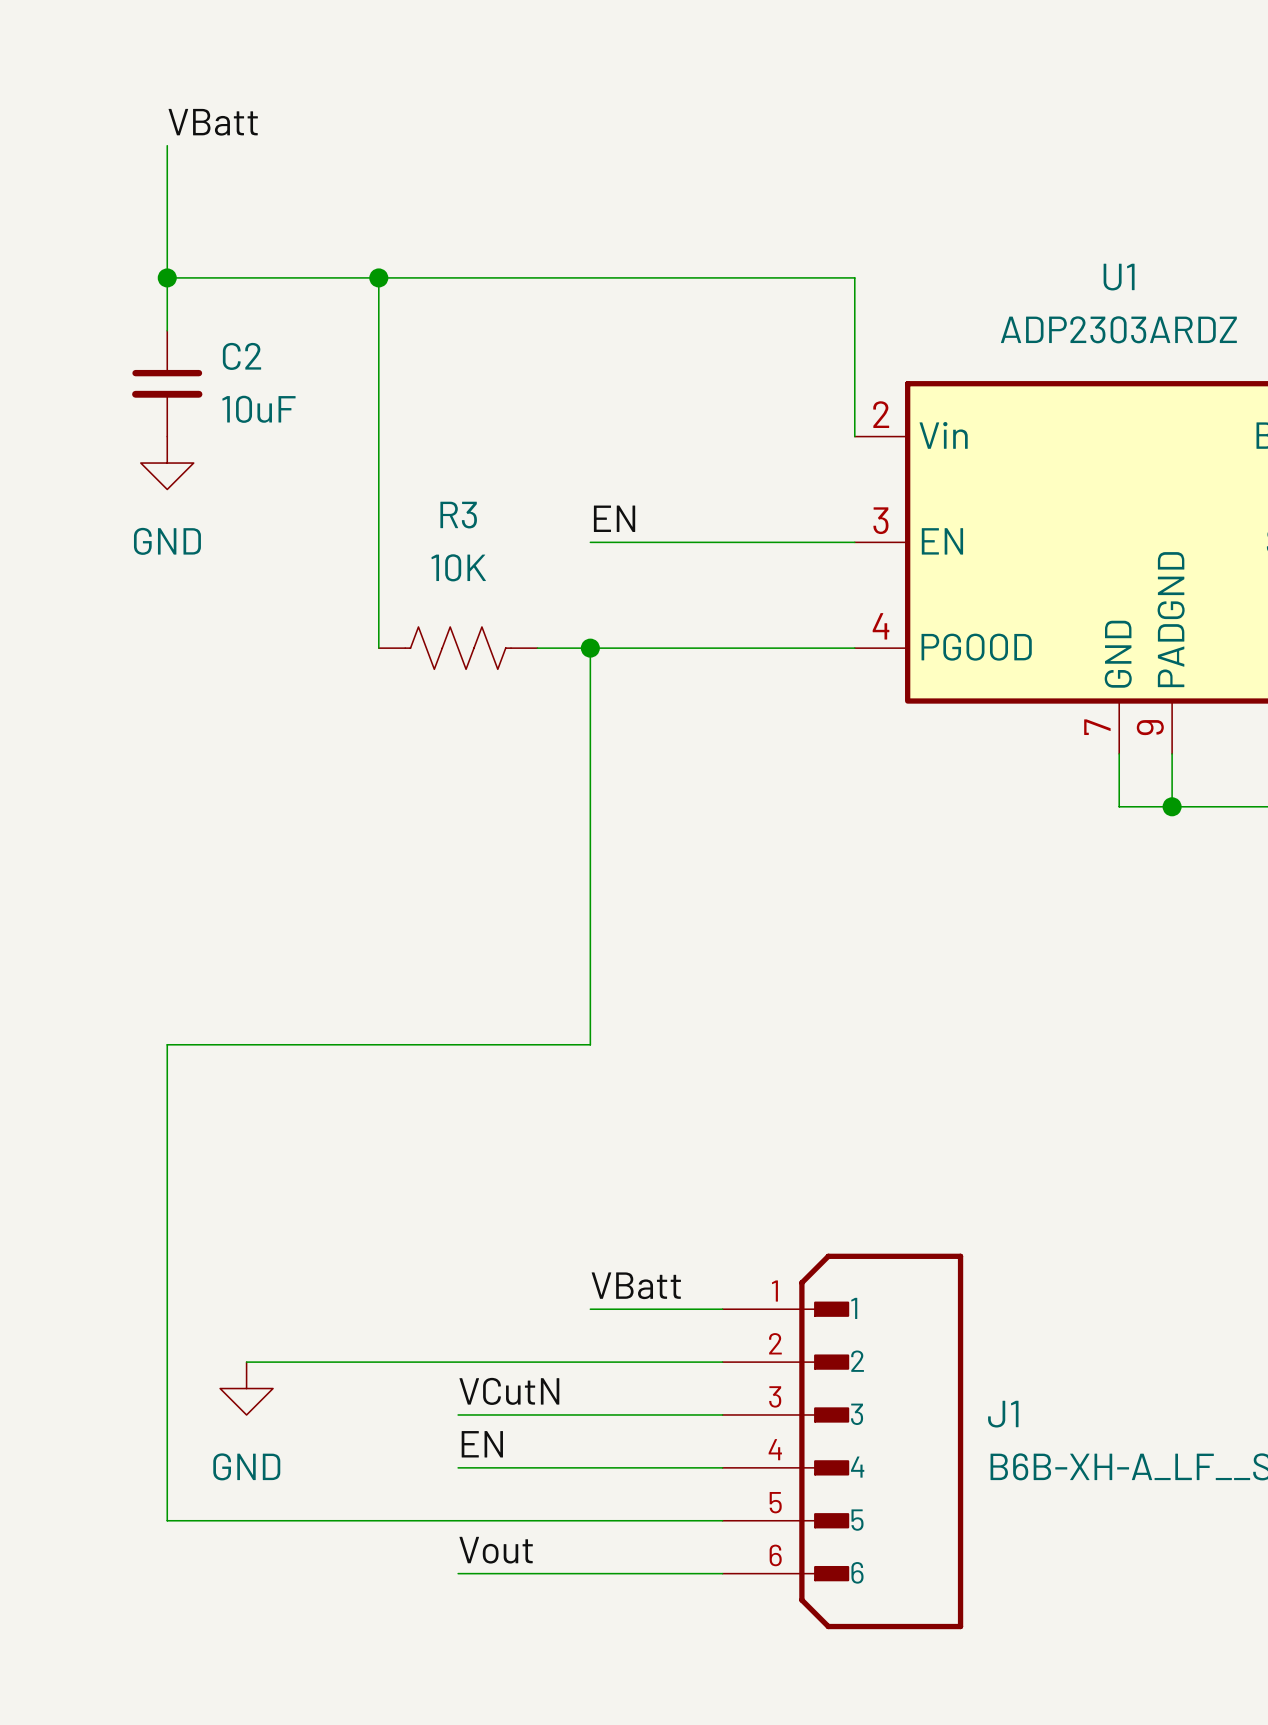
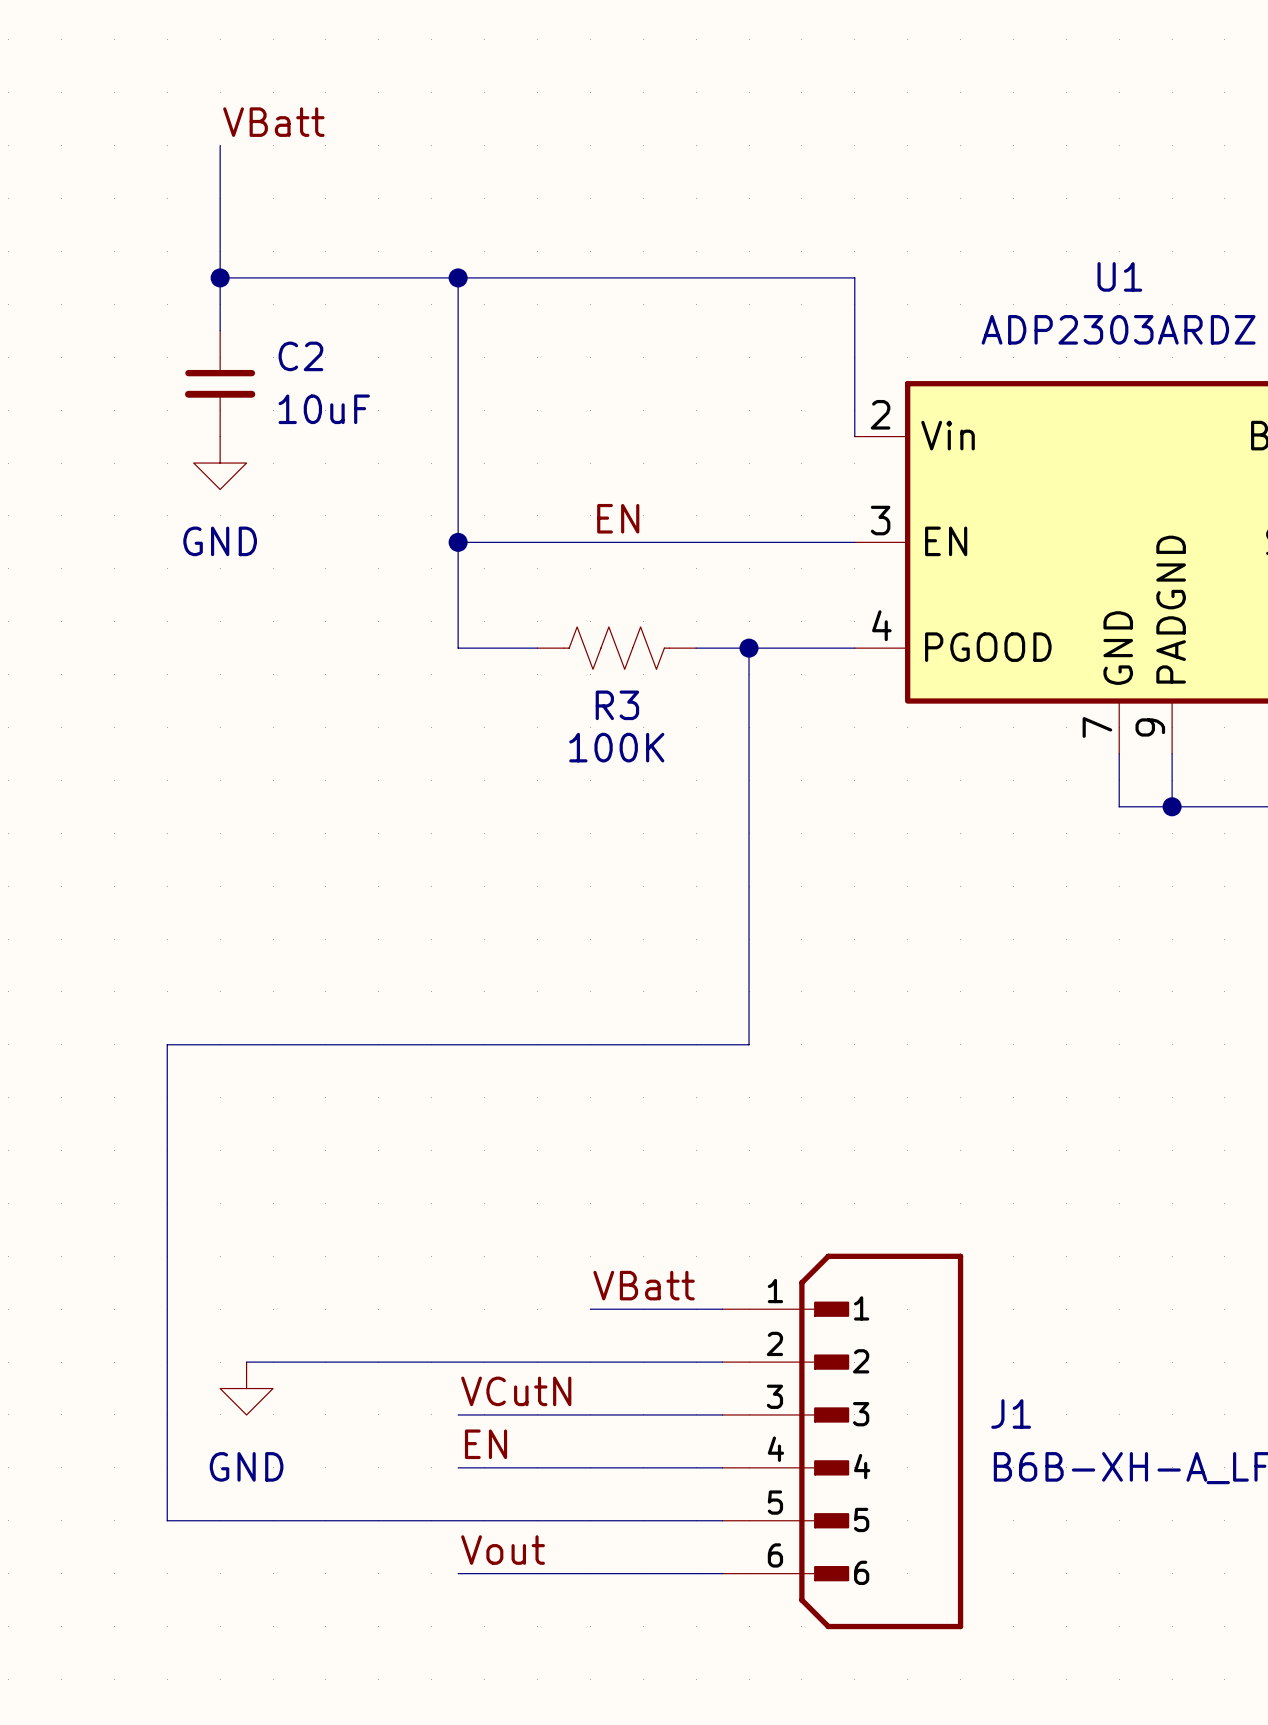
label position: VBatt (213, 122) -> VBatt (273, 122)
wire: (167, 145) (167, 330) -> (220, 145) (220, 330)
wire: (167, 277) (220, 277) -> none
junction position: (167, 277) -> (220, 277)
wire: (378, 277) (378, 648) -> none
junction: (378, 277) -> none
junction: none -> (458, 277)
C2 position: (167, 383) -> (220, 383)
power symbol position: GND (167, 463) -> GND (220, 463)
R3 name position: R3 (458, 515) -> R3 (617, 705)
wire: none -> (458, 542) (590, 542)
junction: none -> (458, 542)
R3 value: 10K (458, 567) -> 100K (616, 747)
R3 position: (458, 648) -> (616, 648)
wire: (537, 648) (696, 648) -> (537, 648) (458, 648) (458, 277)
wire: (590, 648) (590, 1044) -> (749, 648) (749, 1044) (590, 1044)
junction: (590, 648) -> none
junction: none -> (749, 648)

